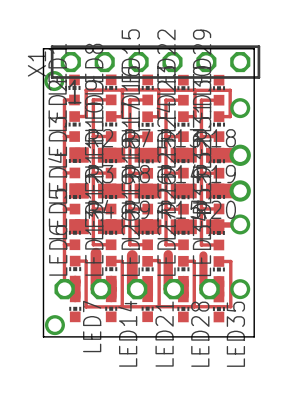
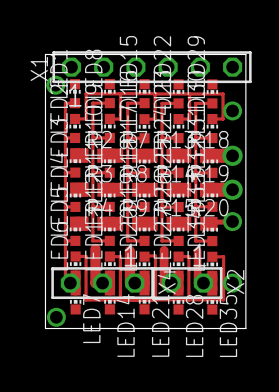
part: (64, 289) -> none
part: (100, 289) -> none
X4: none -> (102, 283)
part: (137, 289) -> none
part: (173, 289) -> none
X2: none -> (187, 283)

